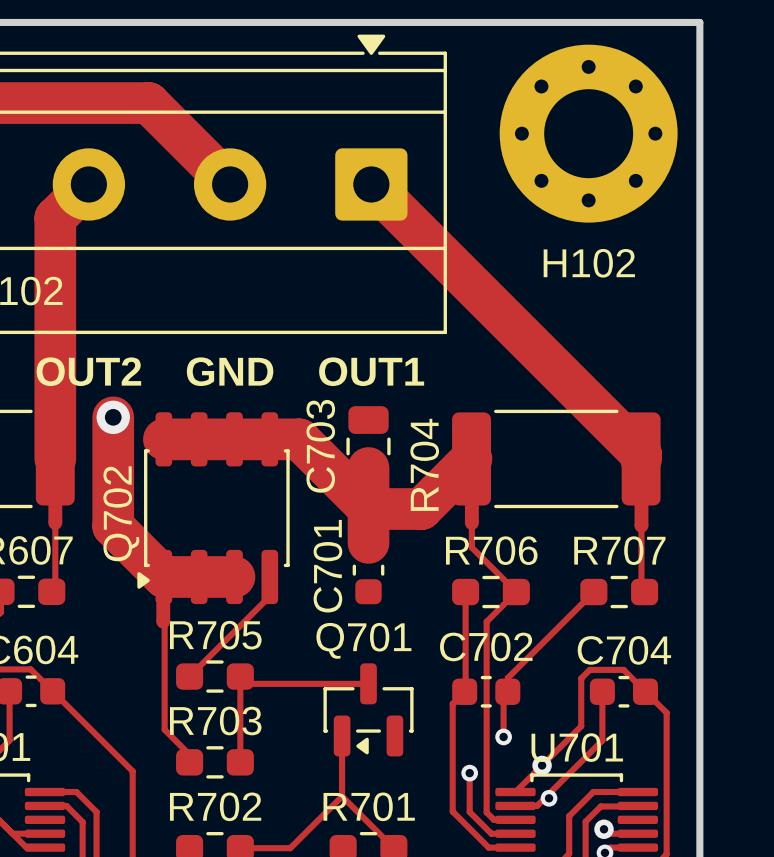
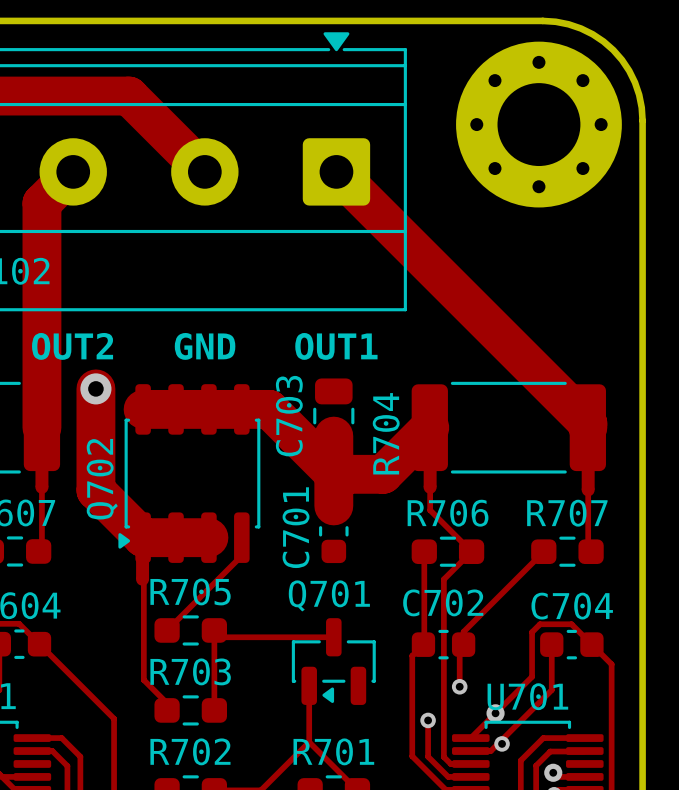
board edge: (592, 22) (699, 22) (699, 129) -> (542, 20) (568, 24) (581, 28) (603, 41) (613, 50) (621, 59) (635, 82) (639, 94) (642, 120)
H102 name: H102 (589, 263) -> none

